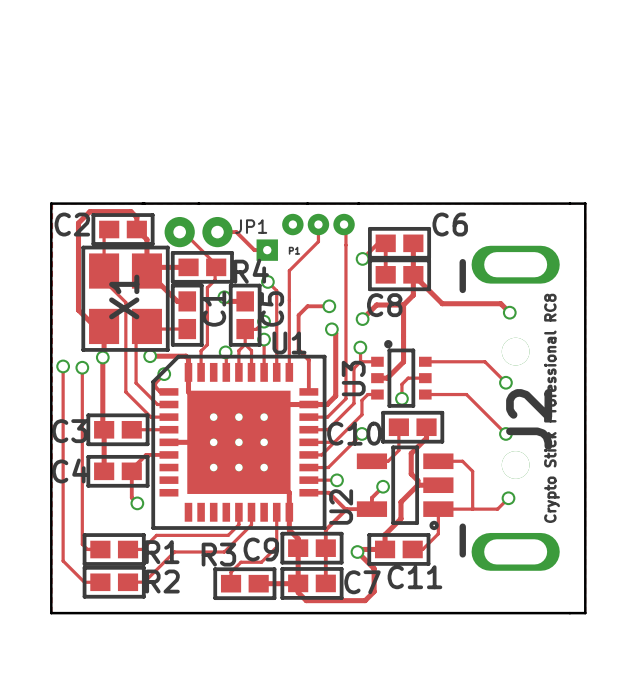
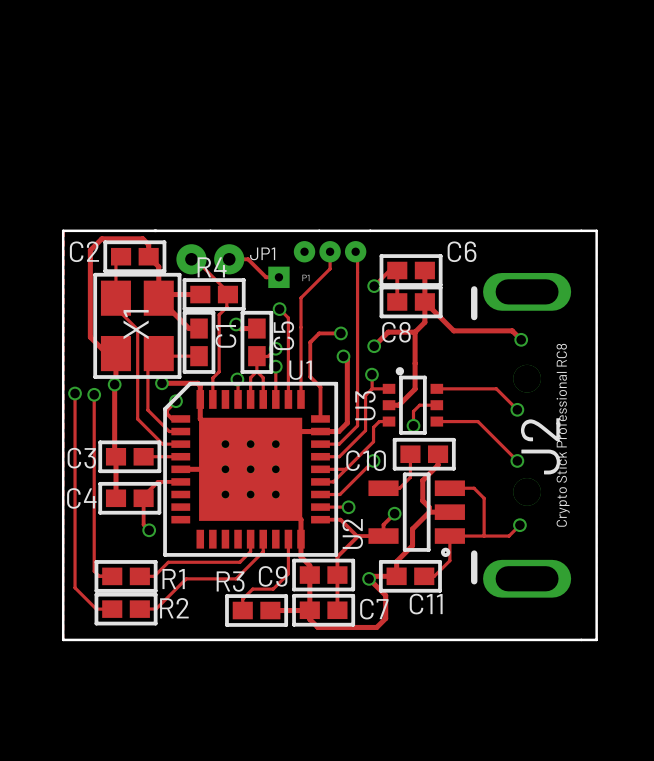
R4 name position: R4 (251, 271) -> R4 (212, 267)

